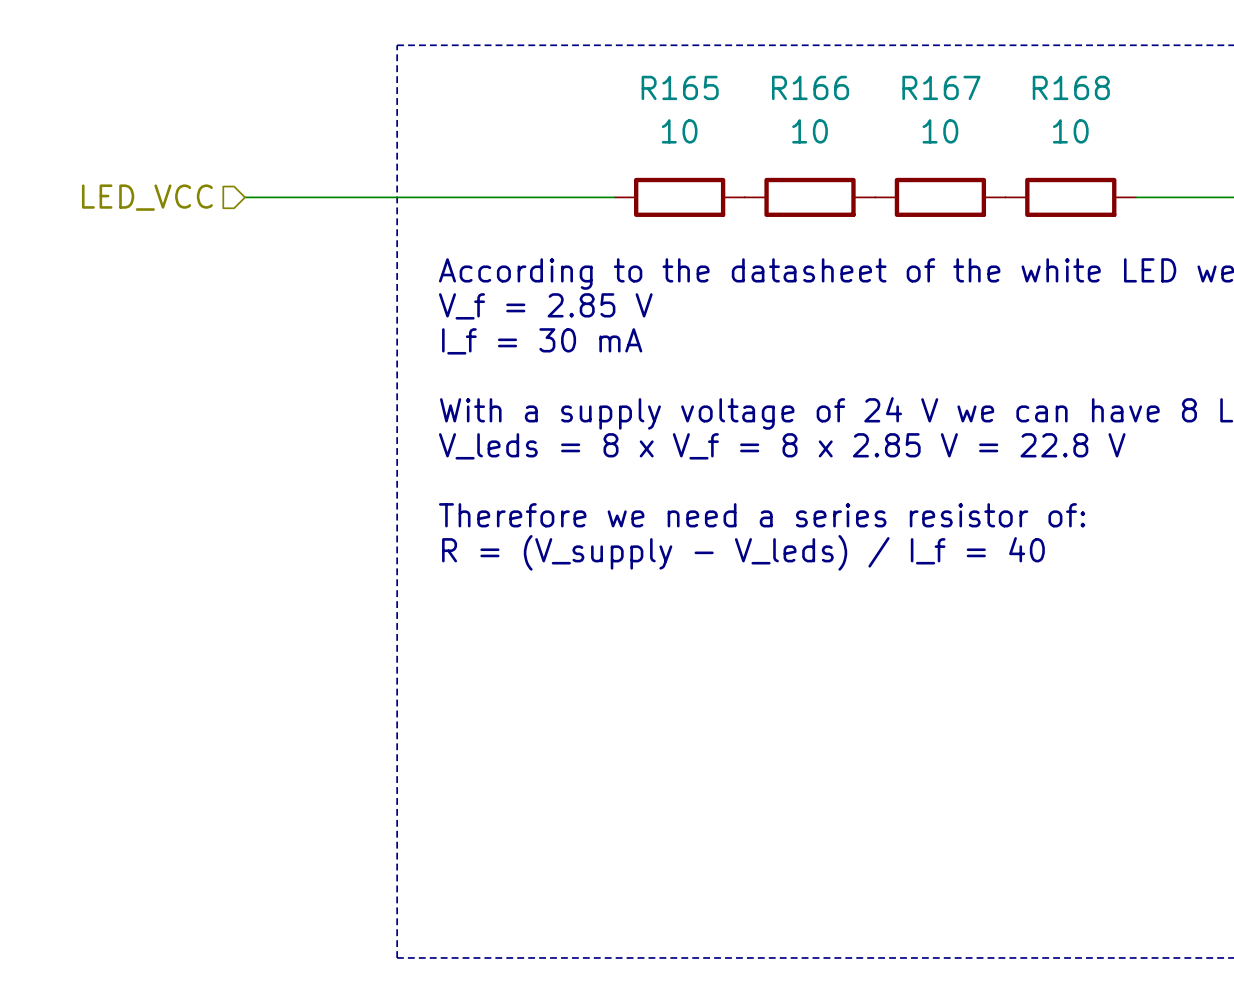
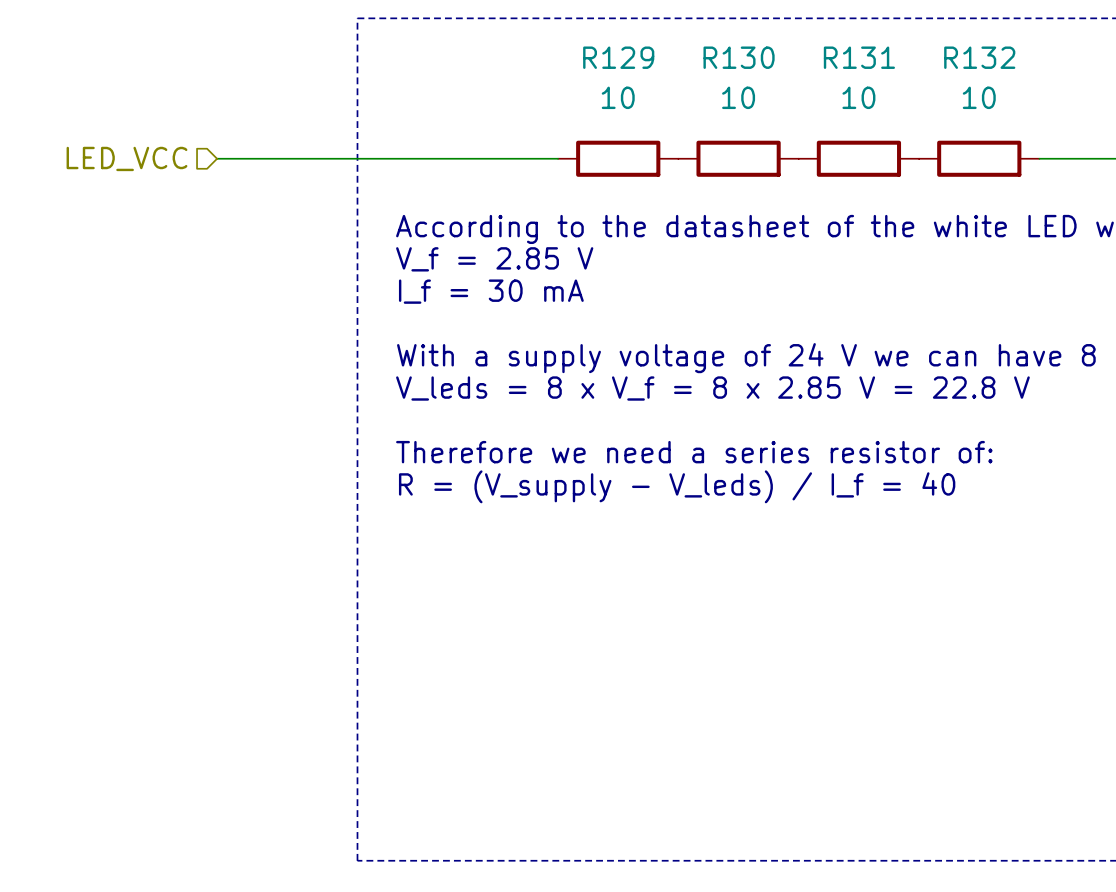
R165 name: R165 (680, 87) -> R129 (618, 57)
R166 name: R166 (810, 87) -> R130 (739, 57)
R167 name: R167 (941, 87) -> R131 (859, 57)
R168 name: R168 (1071, 87) -> R132 (979, 57)

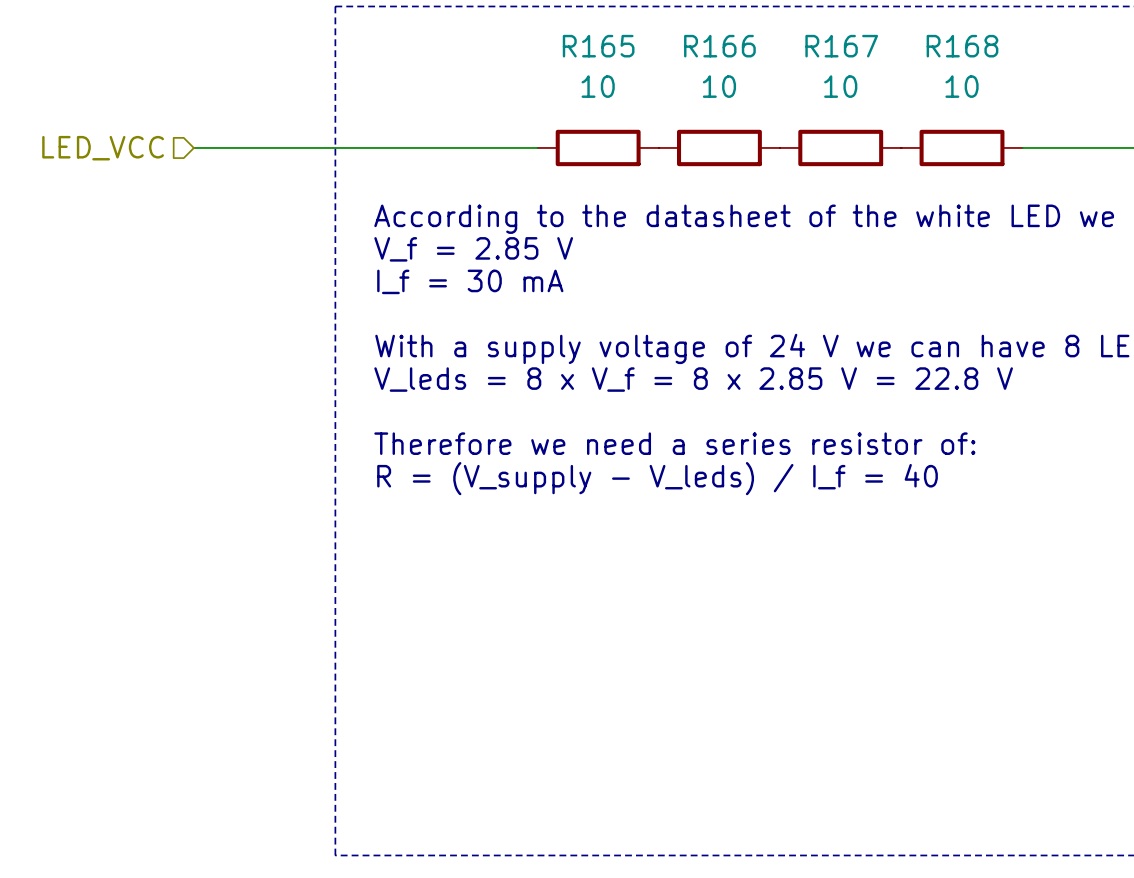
R129 name: R129 (618, 57) -> R165 (598, 46)
R130 name: R130 (739, 57) -> R166 (719, 46)
R131 name: R131 (859, 57) -> R167 (841, 46)
R132 name: R132 (979, 57) -> R168 (962, 46)

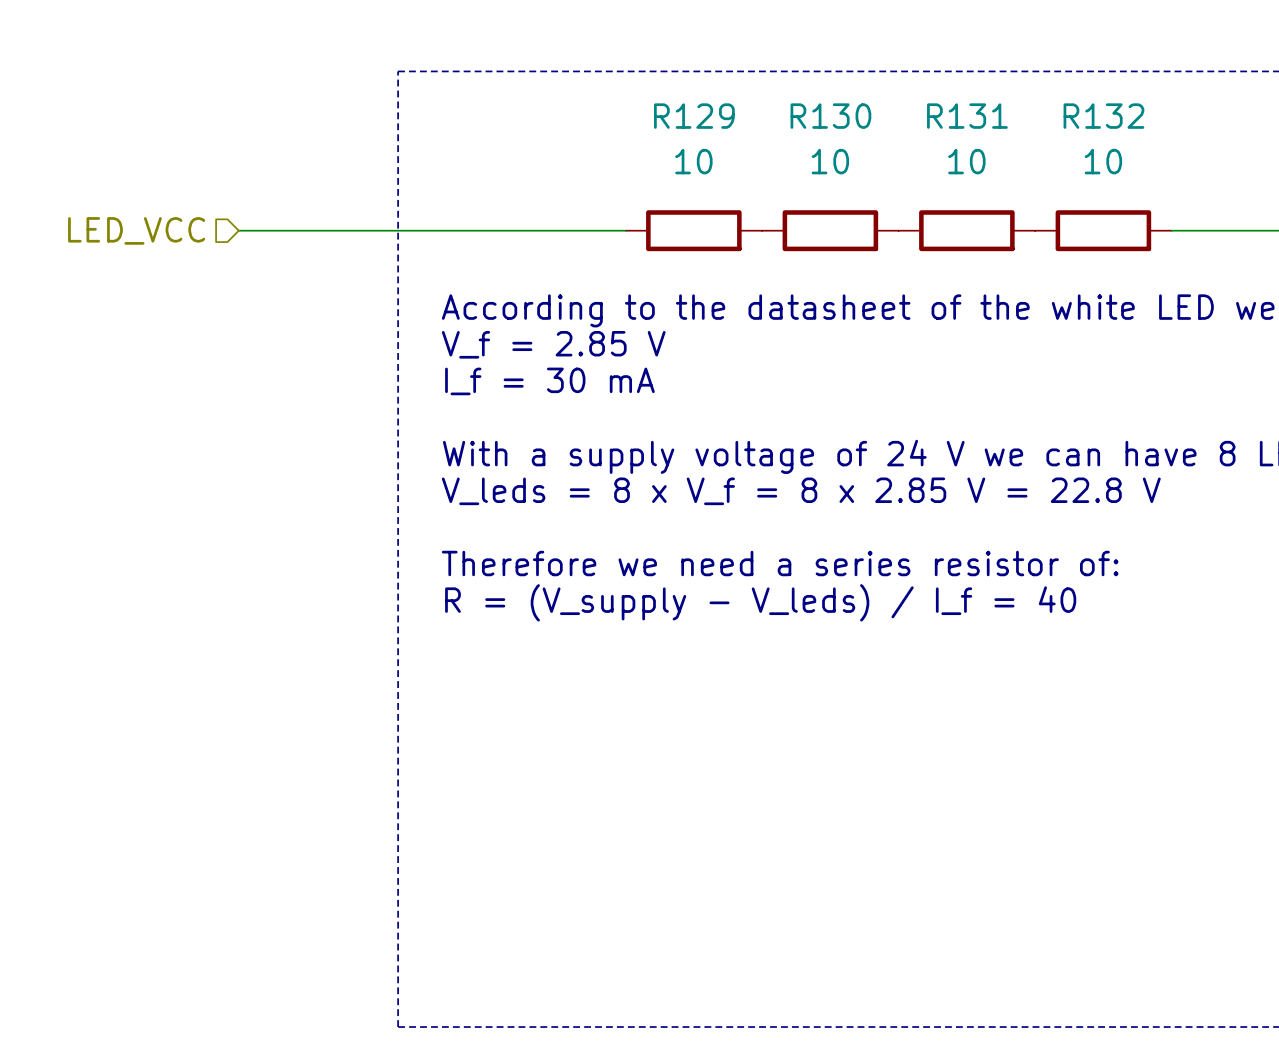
R165 name: R165 (598, 46) -> R129 (694, 116)
R166 name: R166 (719, 46) -> R130 (830, 116)
R167 name: R167 (841, 46) -> R131 (967, 116)
R168 name: R168 (962, 46) -> R132 (1103, 116)

